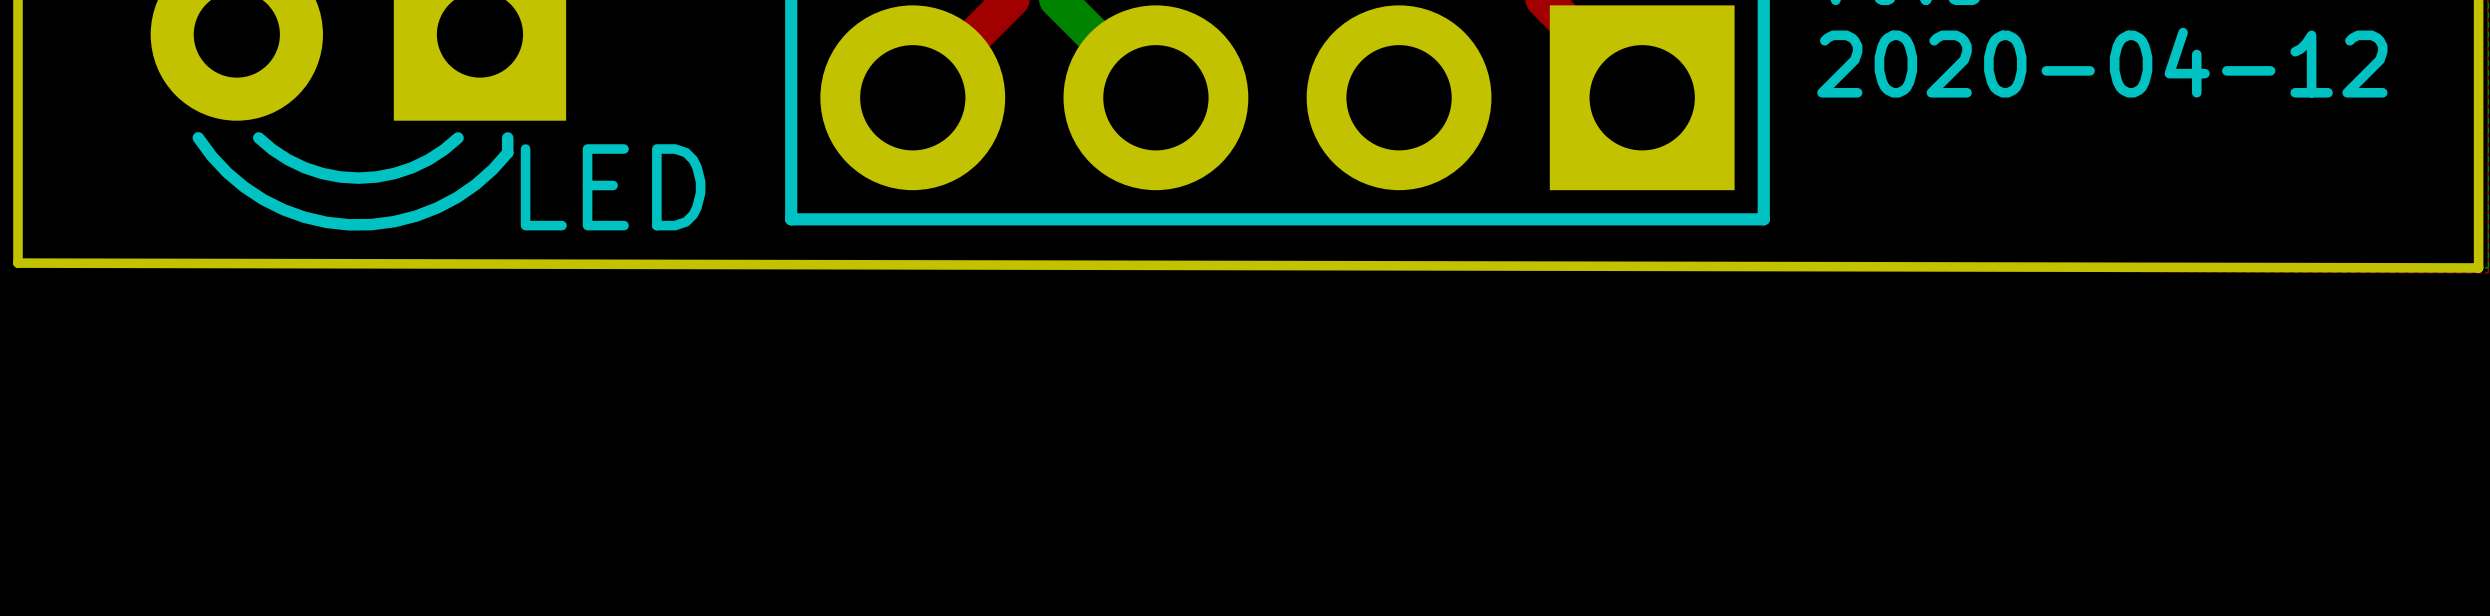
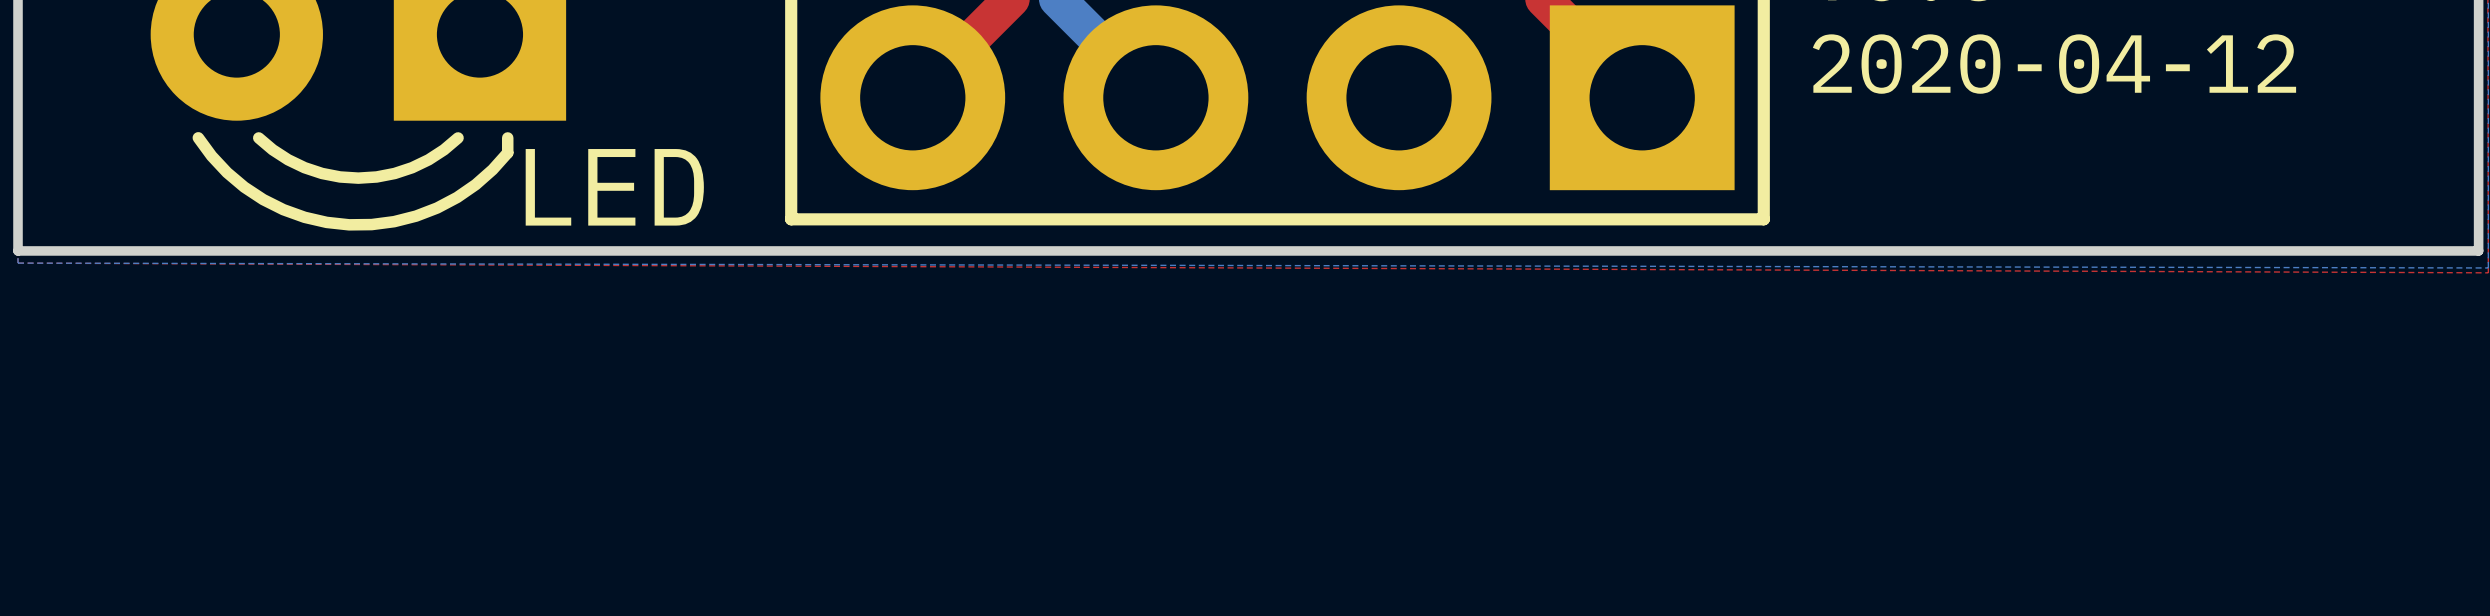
board edge: (2478, 250) (2478, 267) (18, 263) (18, 250) -> (2478, 250) (18, 250)

